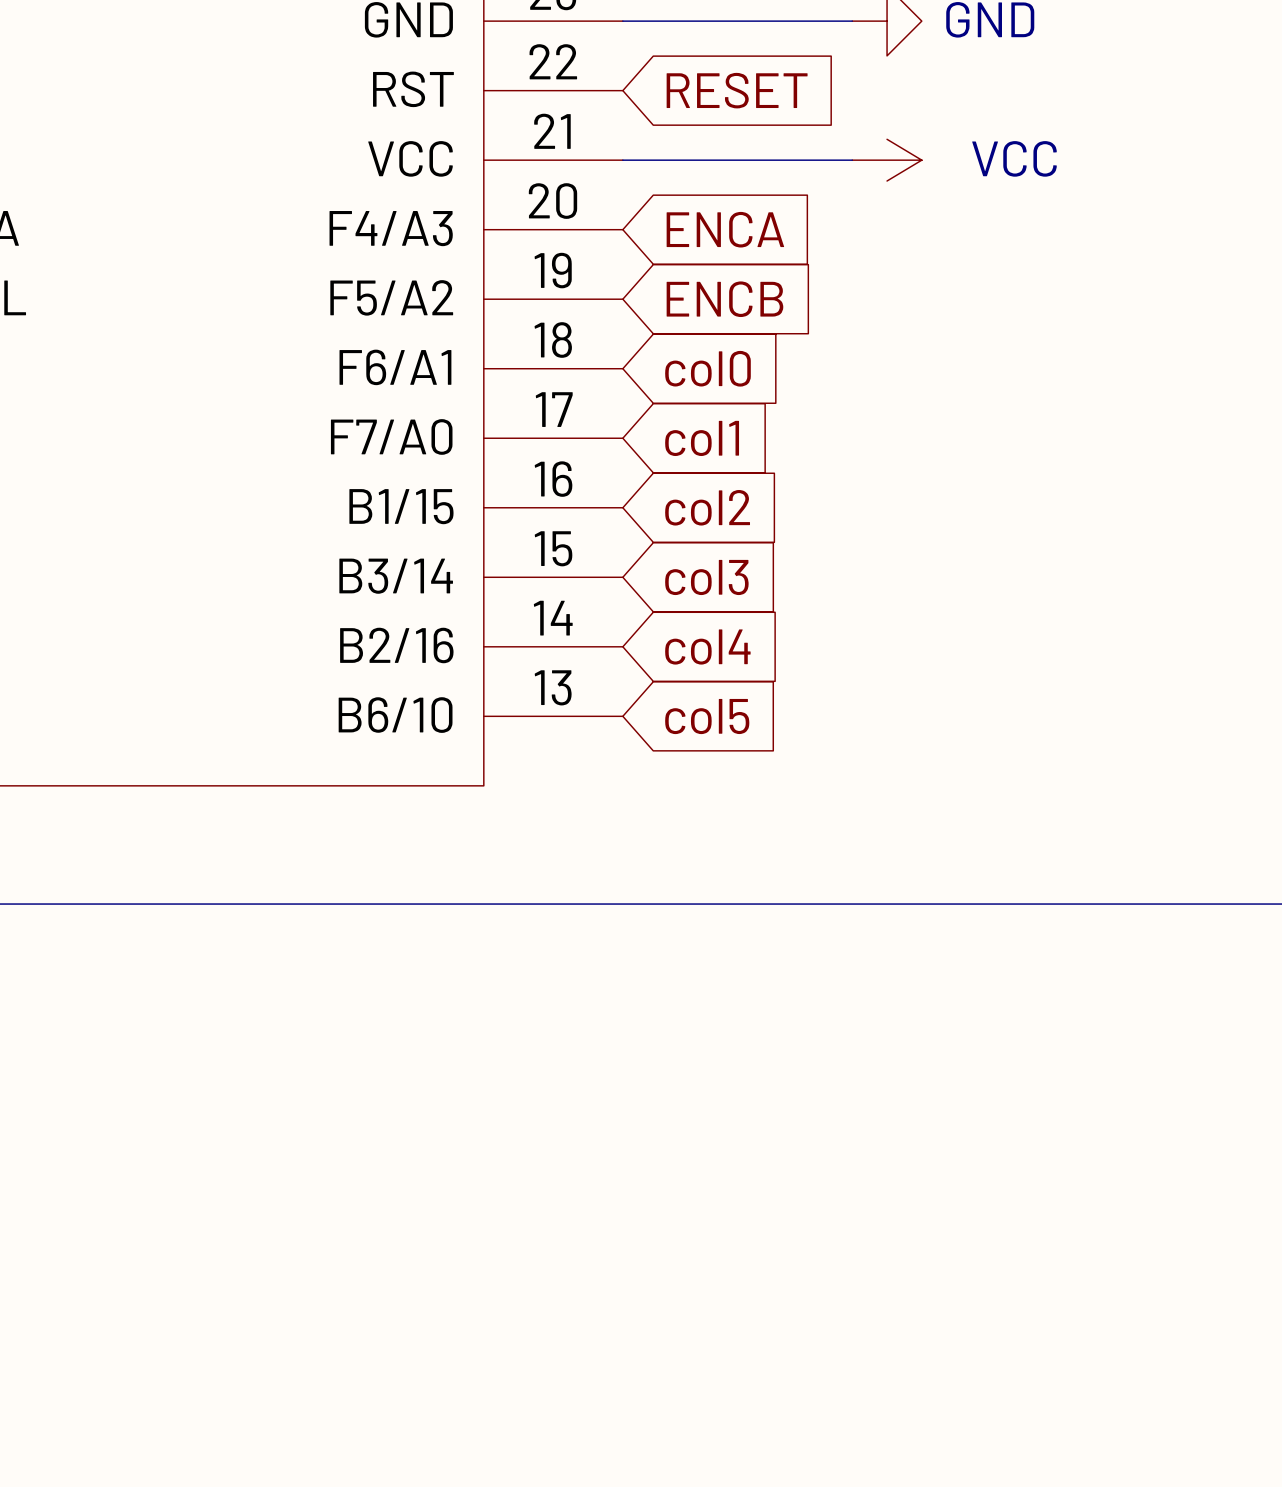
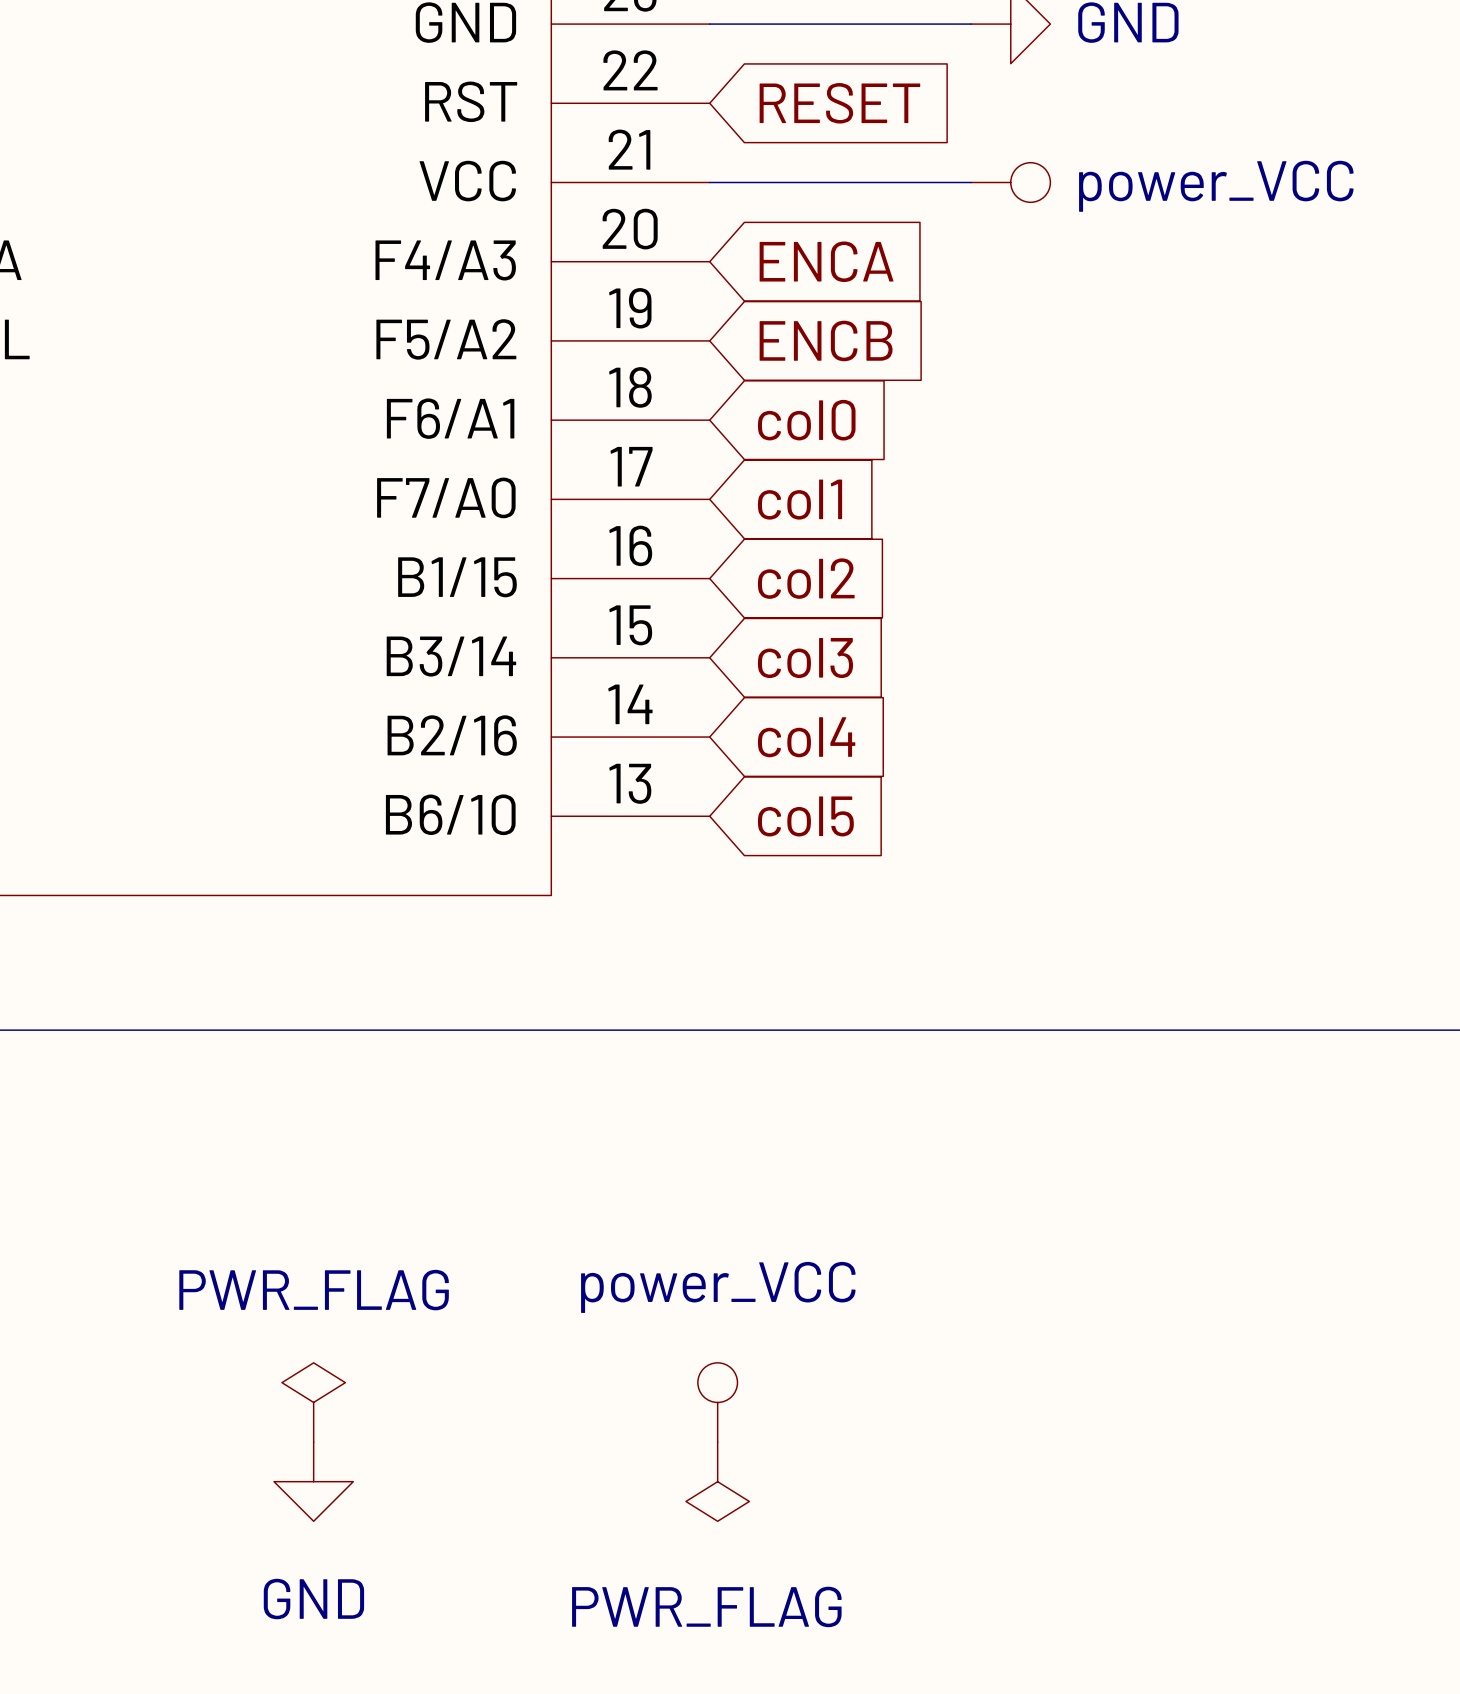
power symbol: VCC (887, 160) -> power_VCC (1010, 182)
power symbol: none -> PWR_FLAG (313, 1402)
power symbol: none -> power_VCC (717, 1402)
power symbol: none -> GND (313, 1481)
power symbol: none -> PWR_FLAG (717, 1481)

